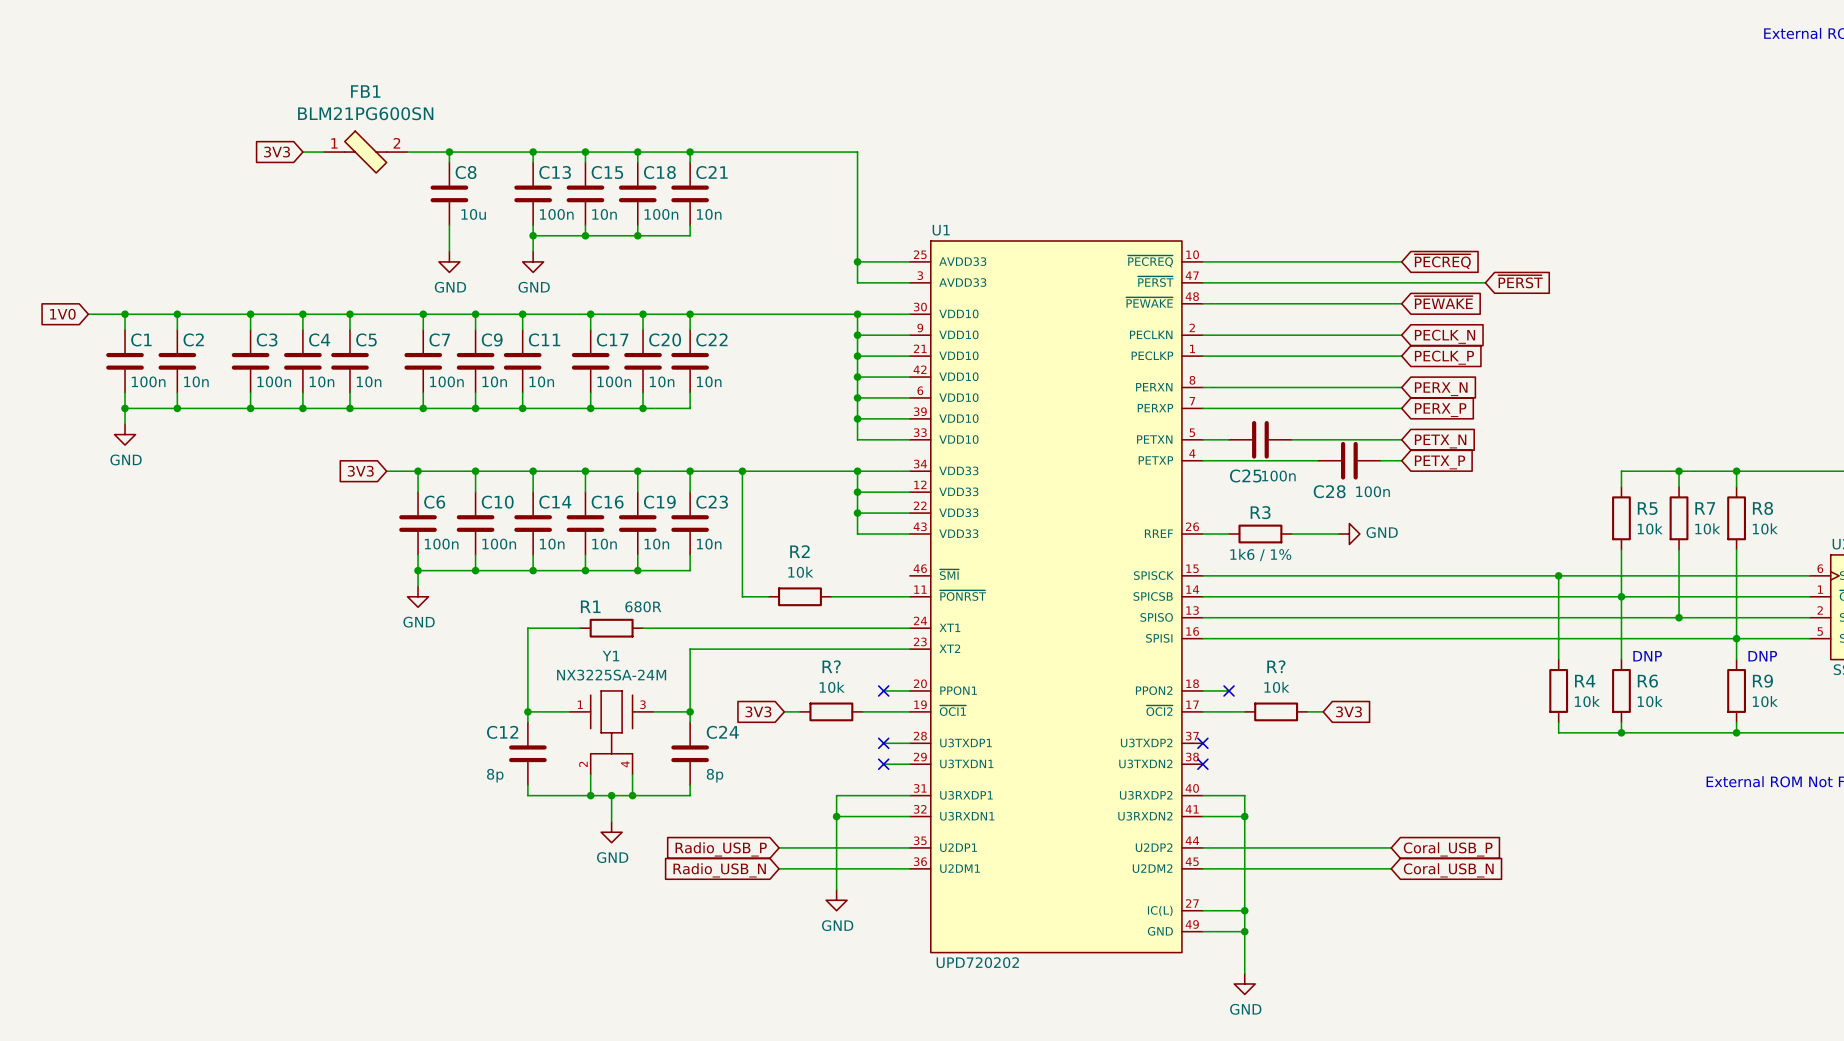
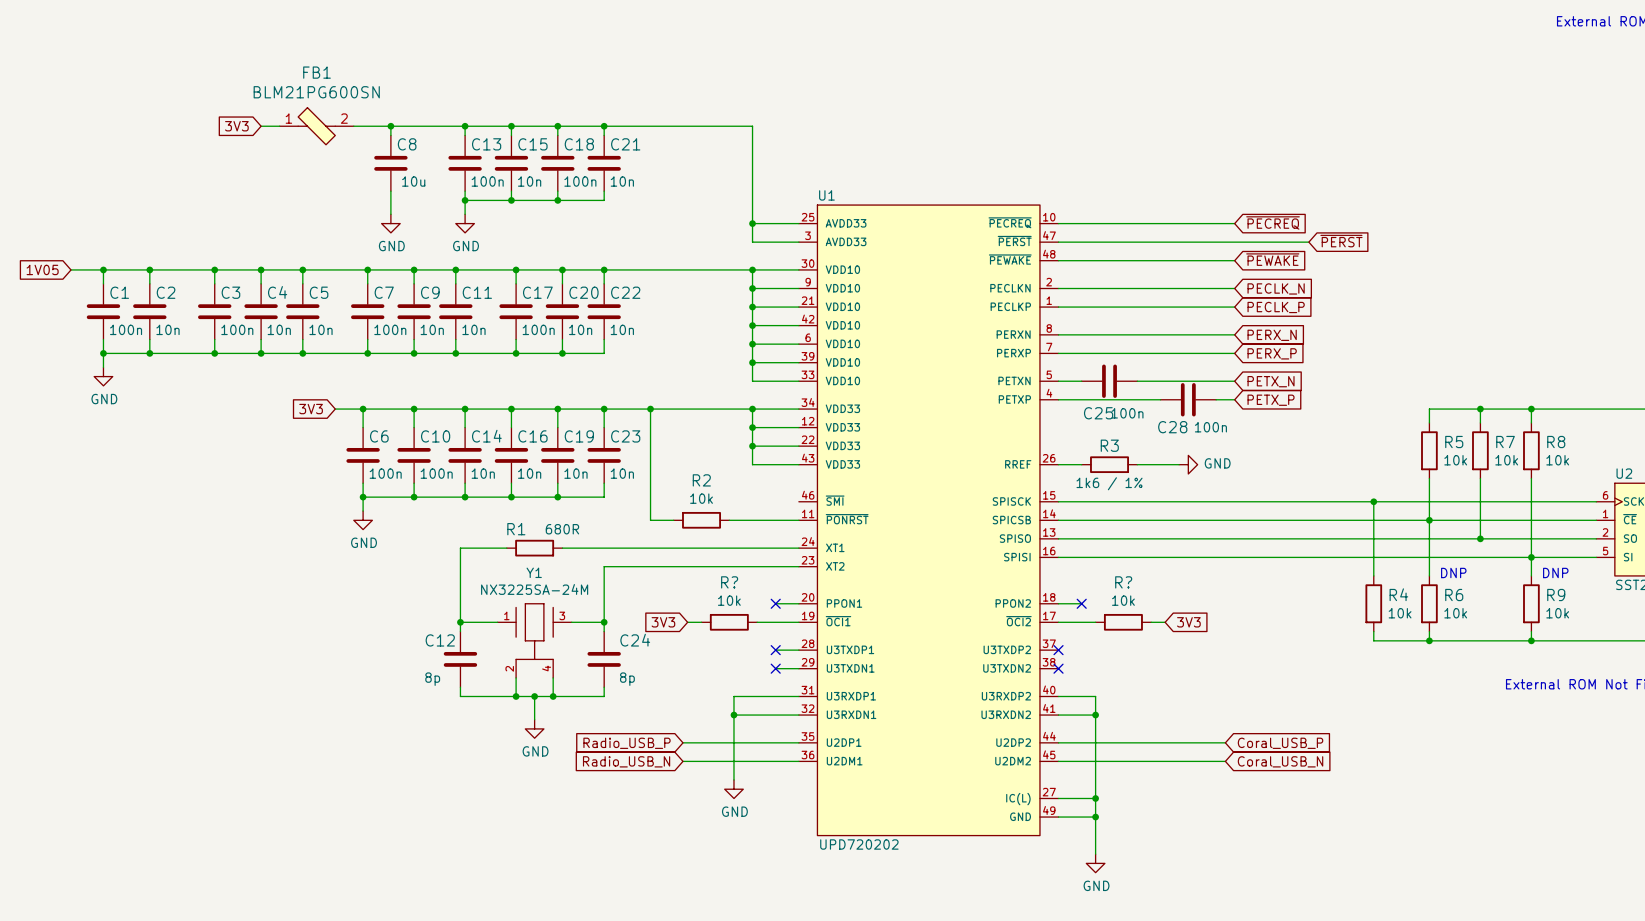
global label: 1V0 (62, 314) -> 1V05 (42, 269)

